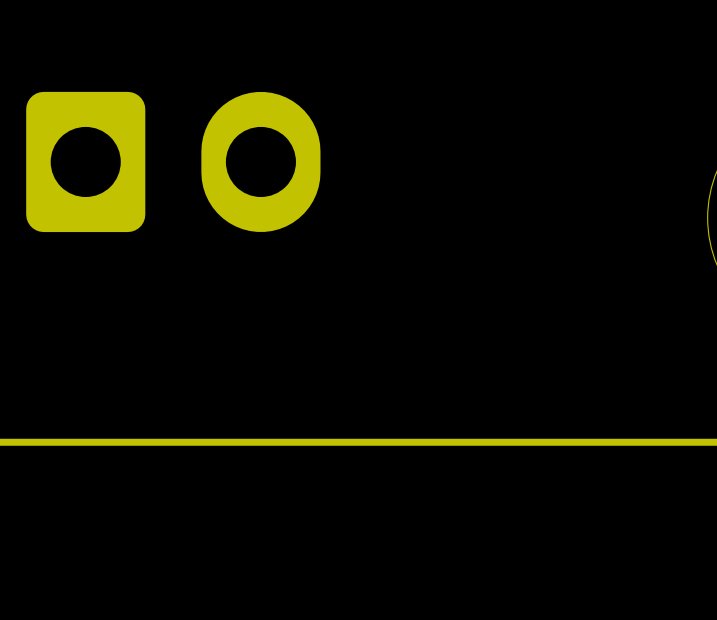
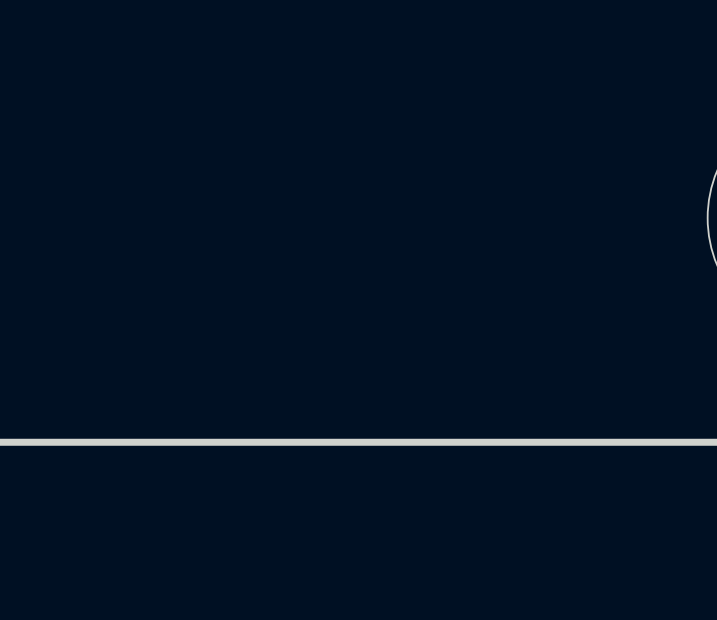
part: (173, 161) -> none

